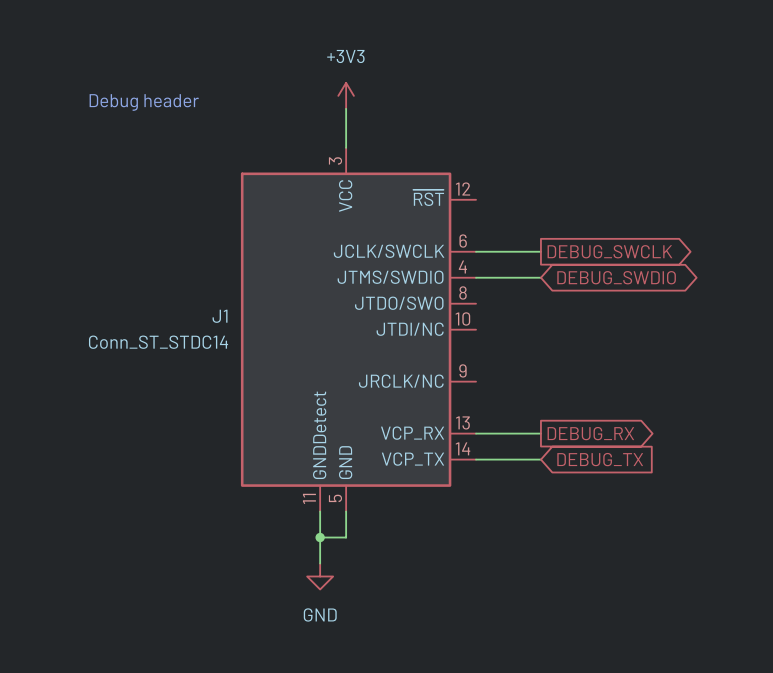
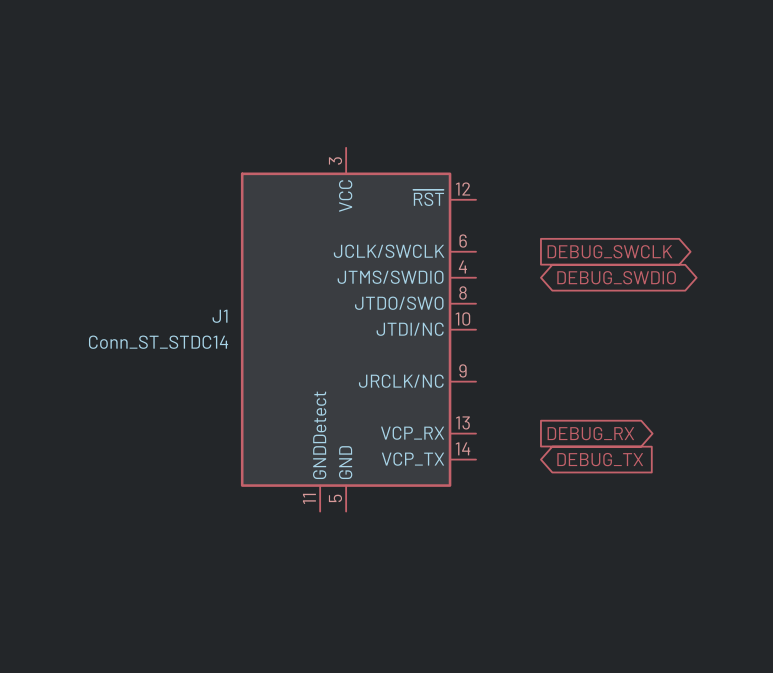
power symbol: +3V3 (346, 95) -> none
text: Debug header (144, 102) -> none
wire: (346, 108) (346, 147) -> none
wire: (476, 251) (540, 251) -> none
wire: (476, 277) (540, 277) -> none
wire: (476, 433) (540, 433) -> none
wire: (476, 459) (540, 459) -> none
wire: (320, 511) (320, 563) -> none
wire: (346, 511) (346, 537) (320, 537) -> none
junction: (320, 537) -> none
power symbol: GND (320, 576) -> none

